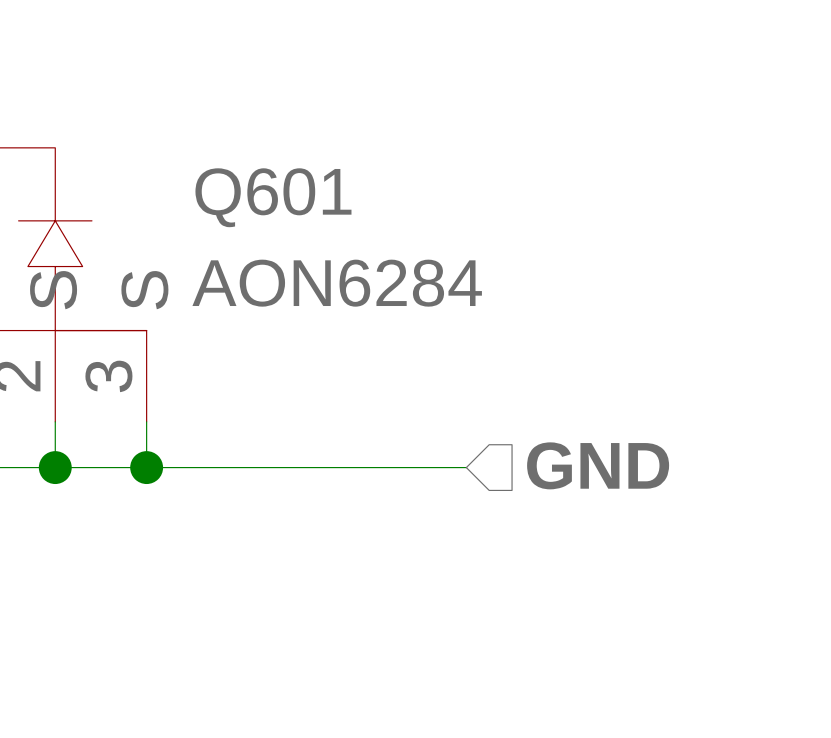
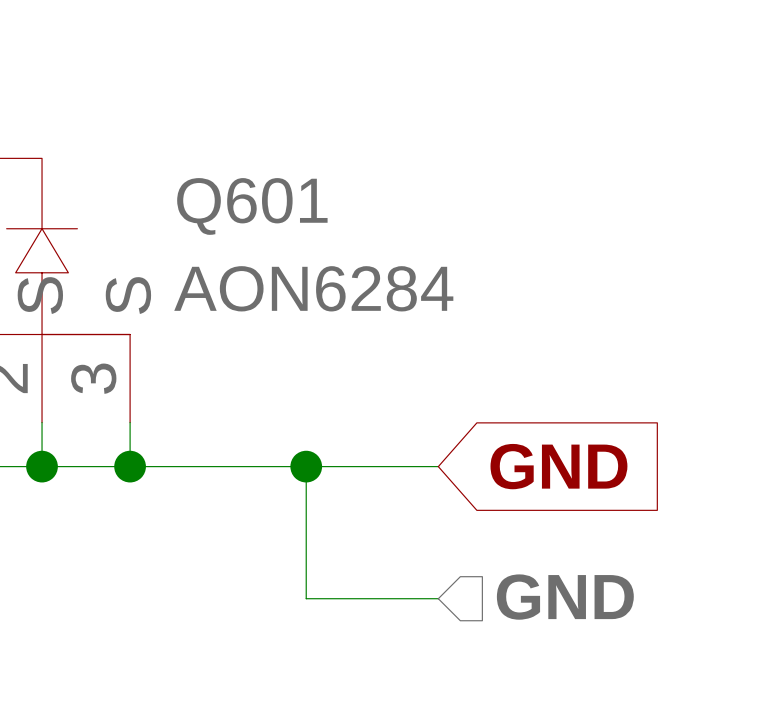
hierarchical label position: GND (598, 465) -> GND (565, 597)
wire: none -> (306, 466) (306, 598) (438, 598)
junction: none -> (306, 466)
global label: none -> GND (558, 466)

